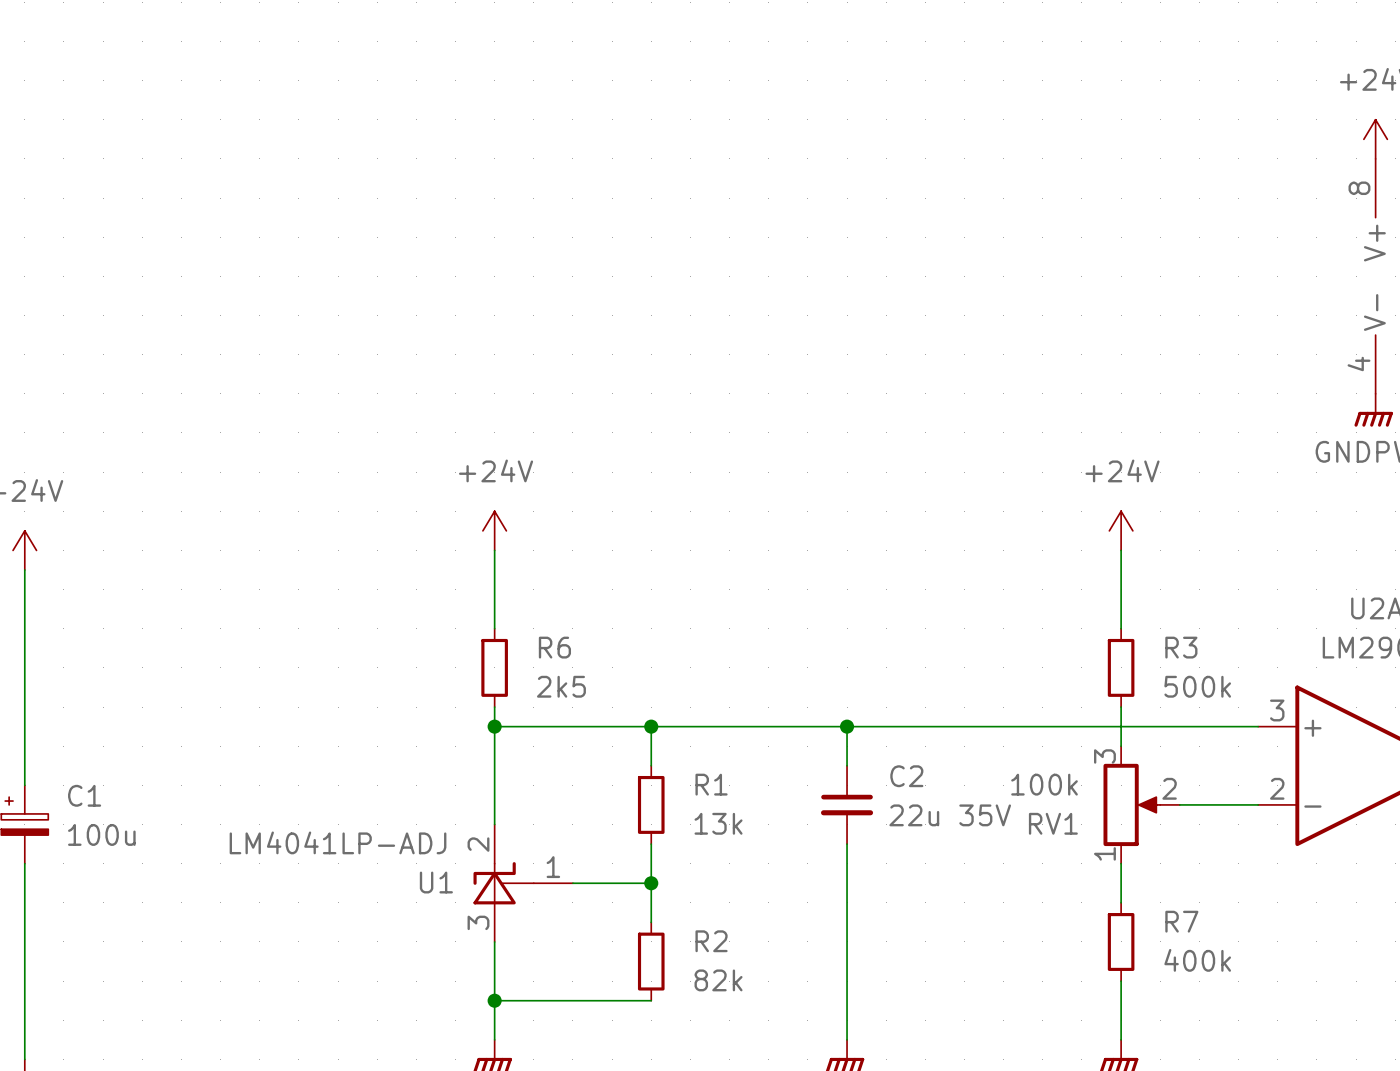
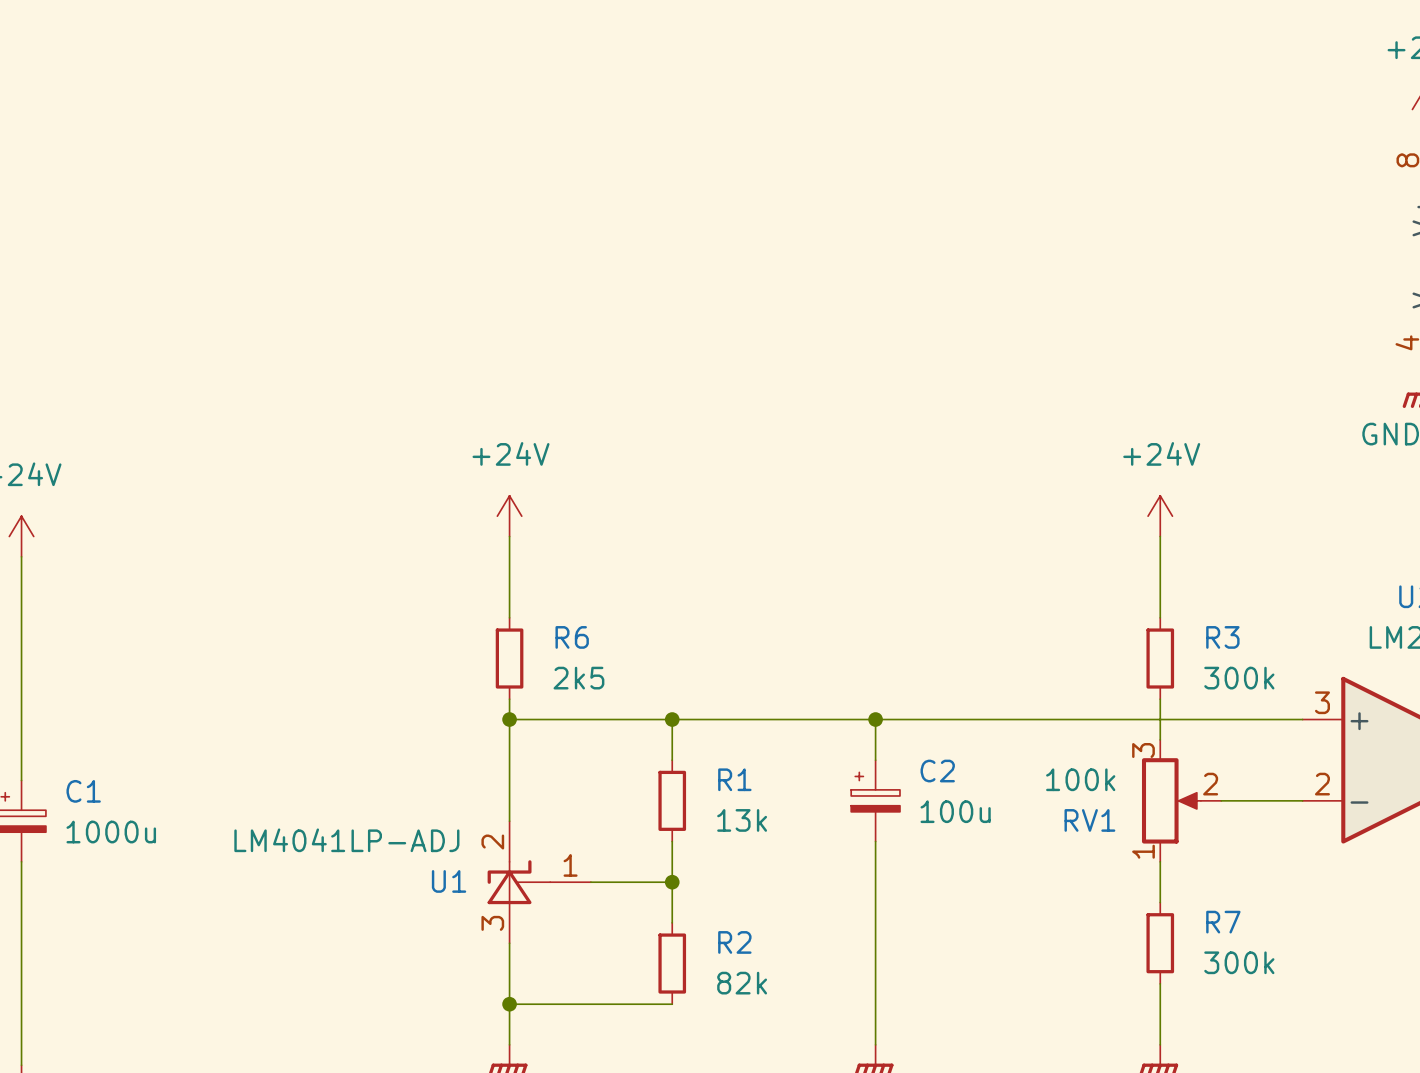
R3 value: 500k (1197, 686) -> 300k (1239, 678)
C2 symbol: [820, 765, 874, 845] -> [851, 760, 900, 842]
C2 value: 22u 35V (950, 815) -> 100u (955, 811)
C1 value: 100u (101, 834) -> 1000u (111, 832)
R7 value: 400k (1197, 960) -> 300k (1239, 962)

